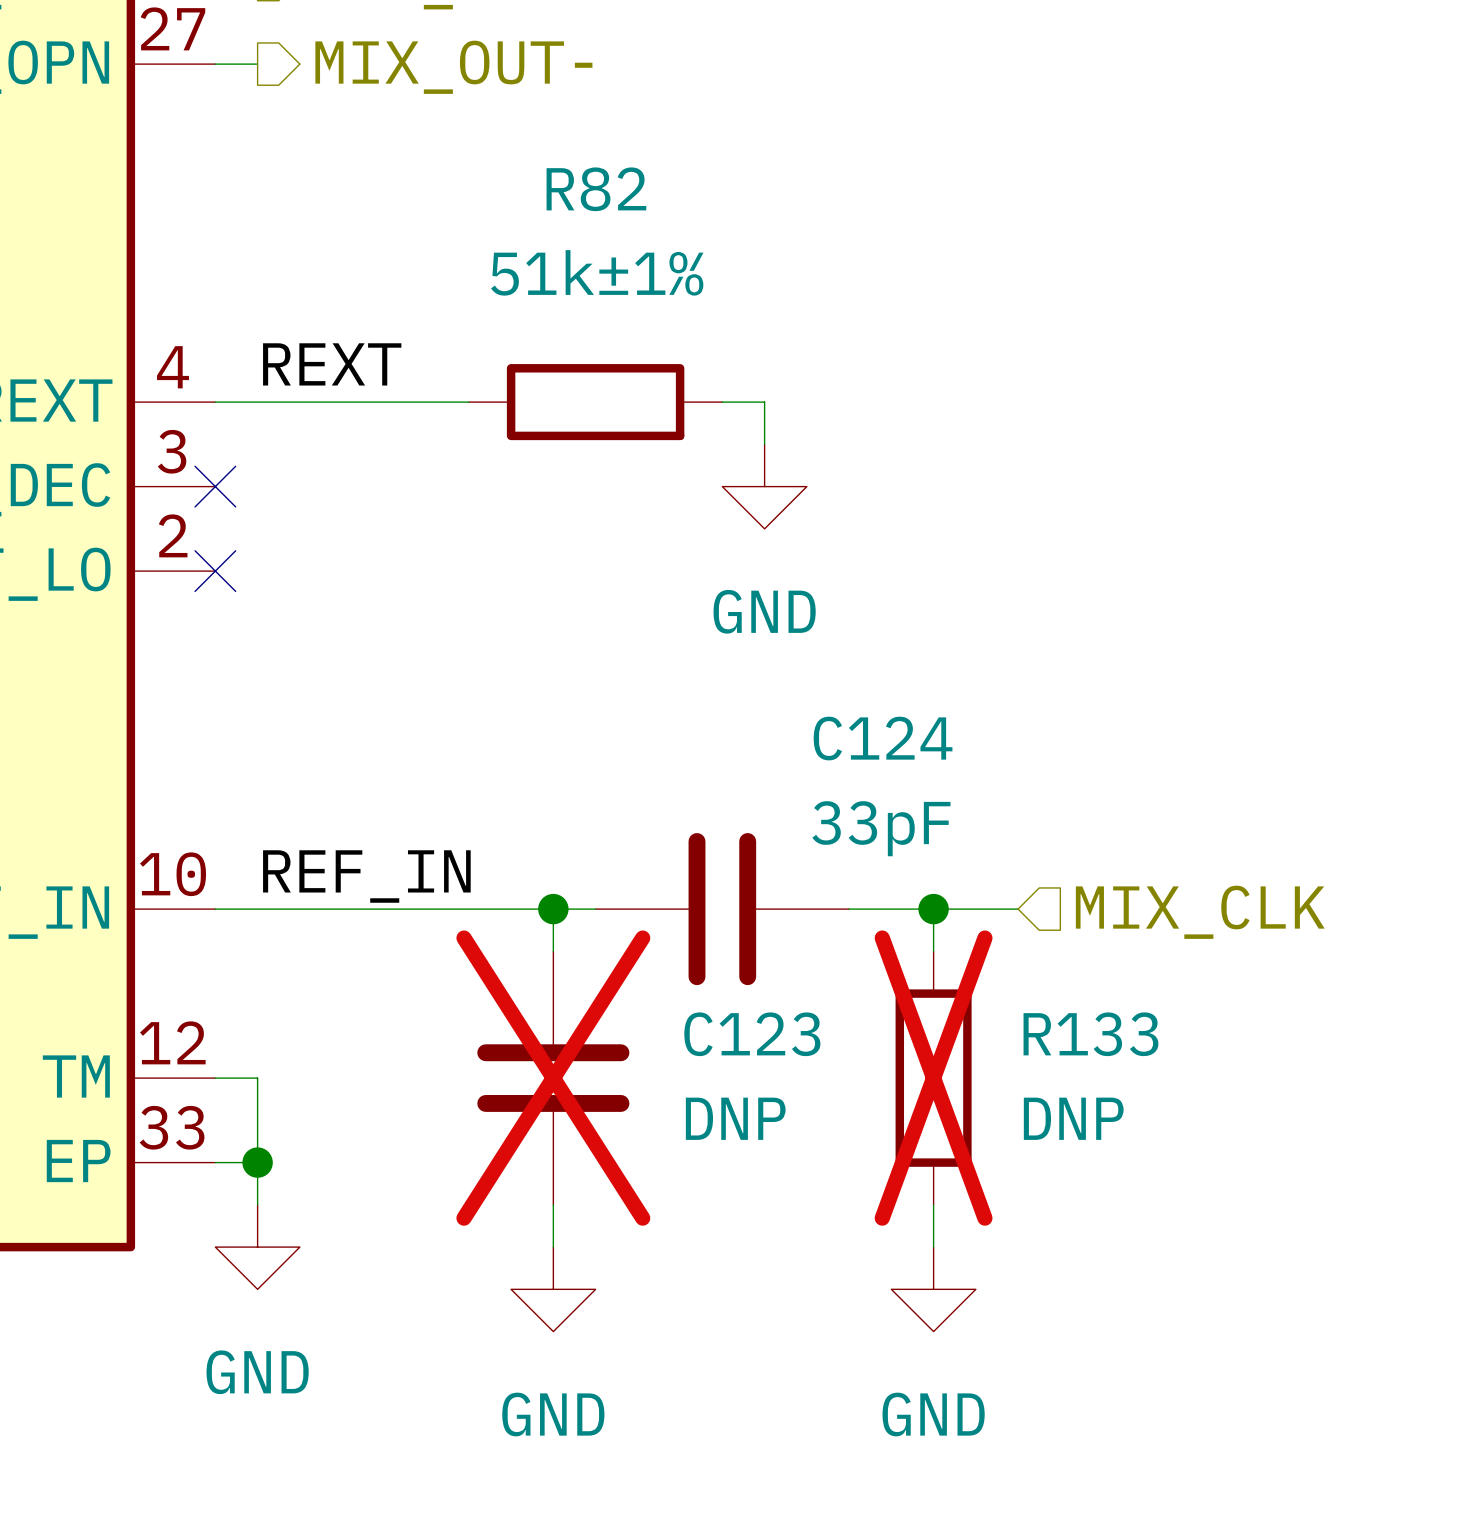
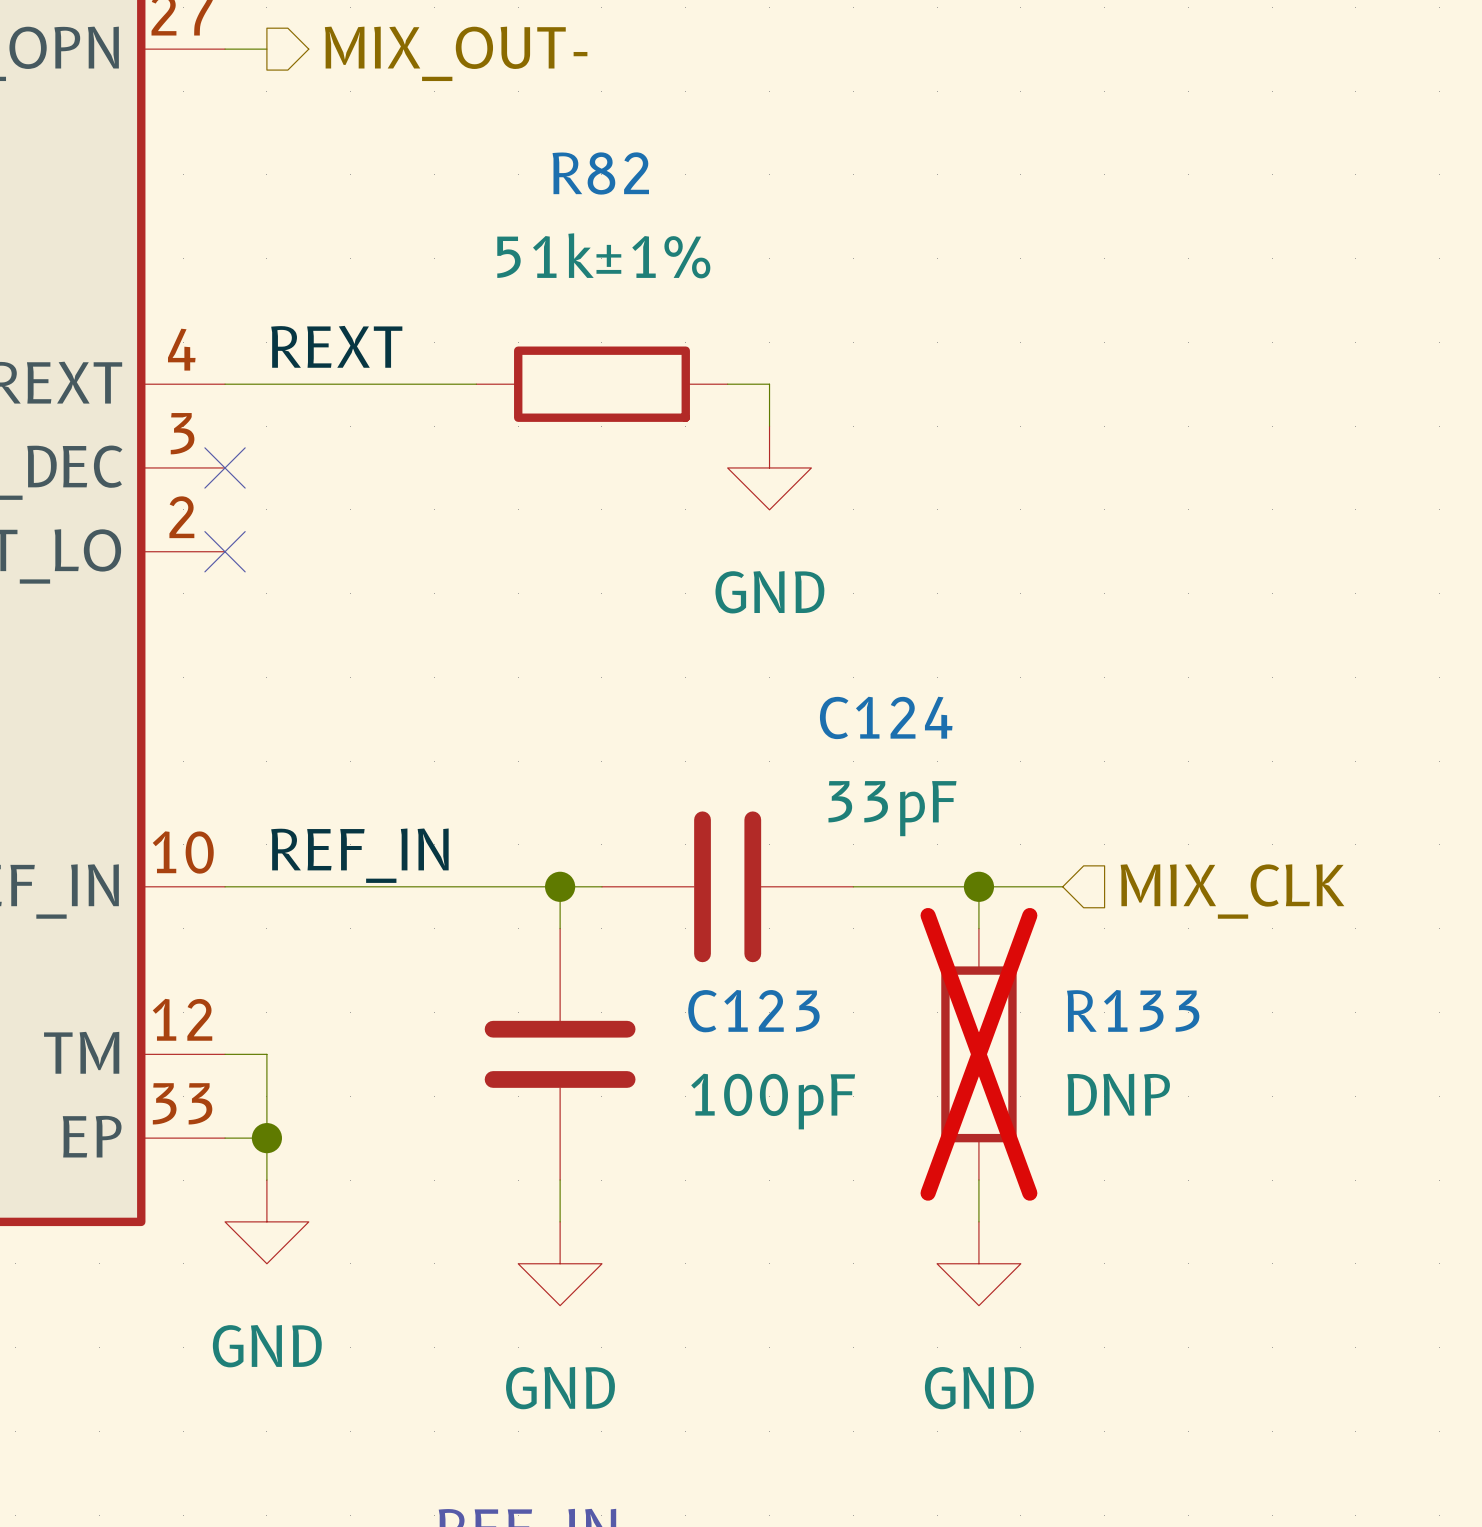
wire: (933, 909) (933, 951) -> (978, 886) (978, 928)
junction position: (933, 909) -> (978, 886)
wire: none -> (1020, 886) (1062, 886)
hierarchical label position: MIX_CLK (1200, 912) -> MIX_CLK (1232, 891)
C123 do-not-place cross: (553, 1078) -> none
R133 position: (933, 1078) -> (978, 1054)
C123 value: DNP (735, 1118) -> 100pF (773, 1101)
wire: (933, 1204) (933, 1247) -> (978, 1180) (978, 1221)
power symbol position: GND (933, 1289) -> GND (978, 1263)

